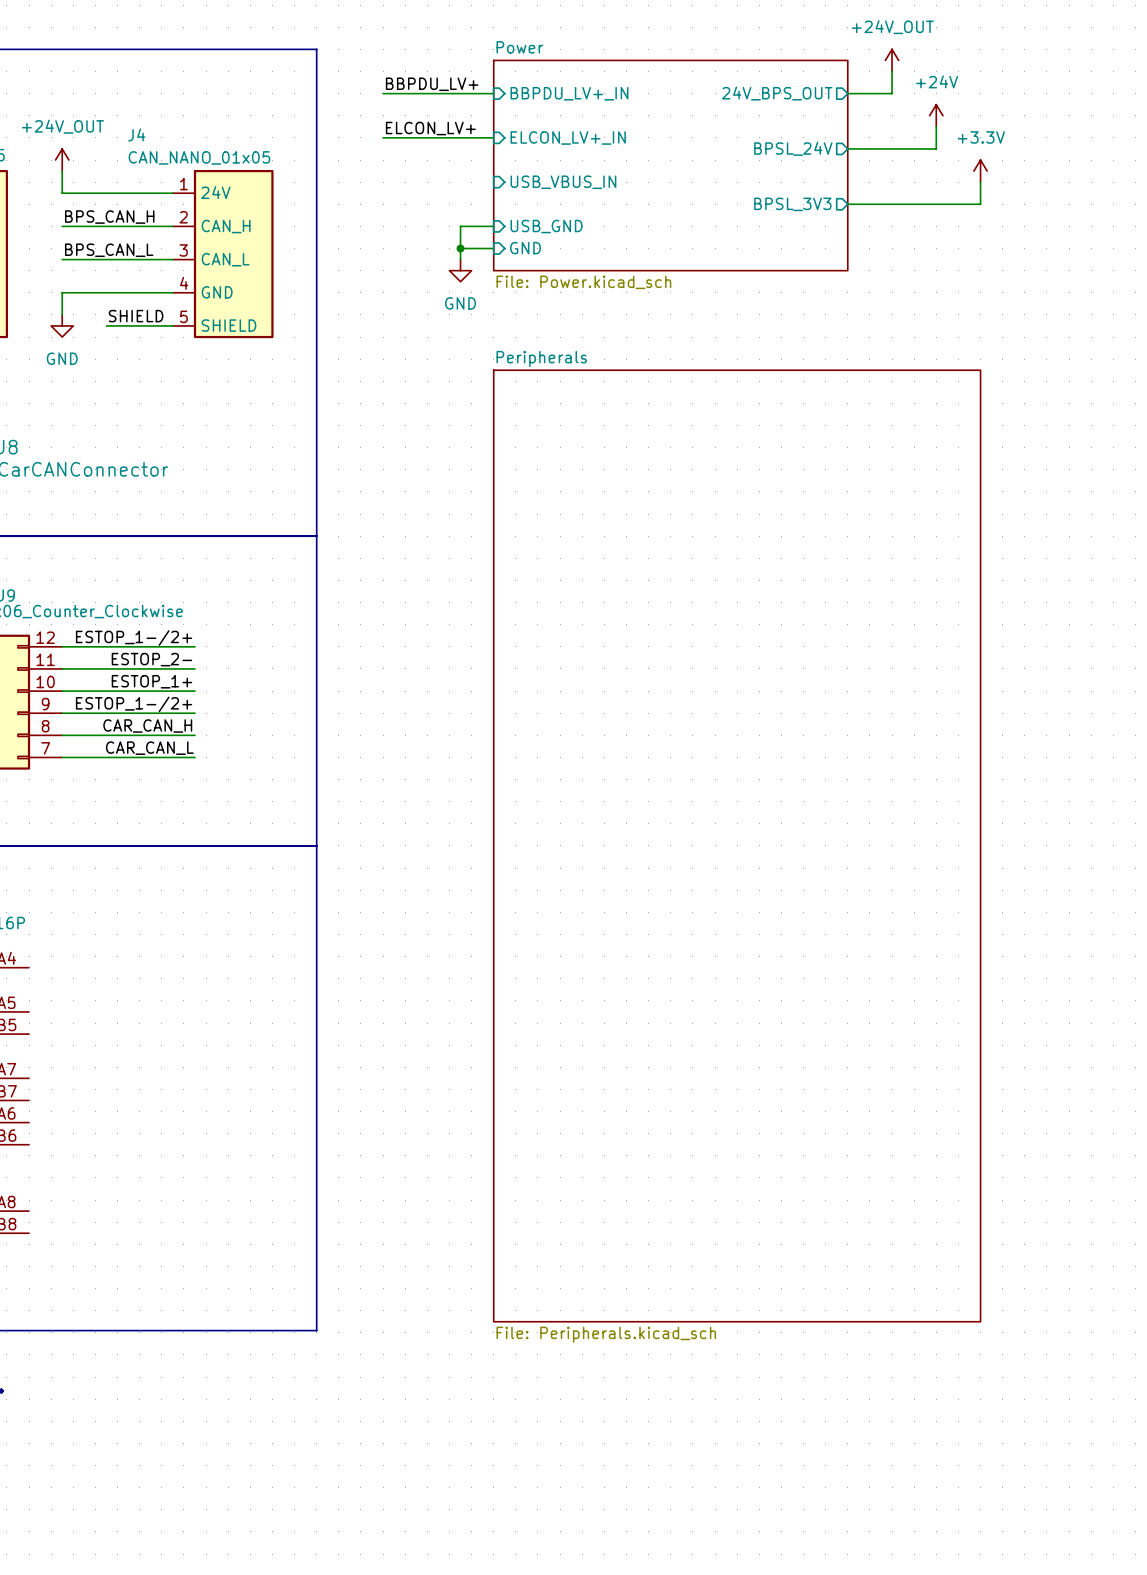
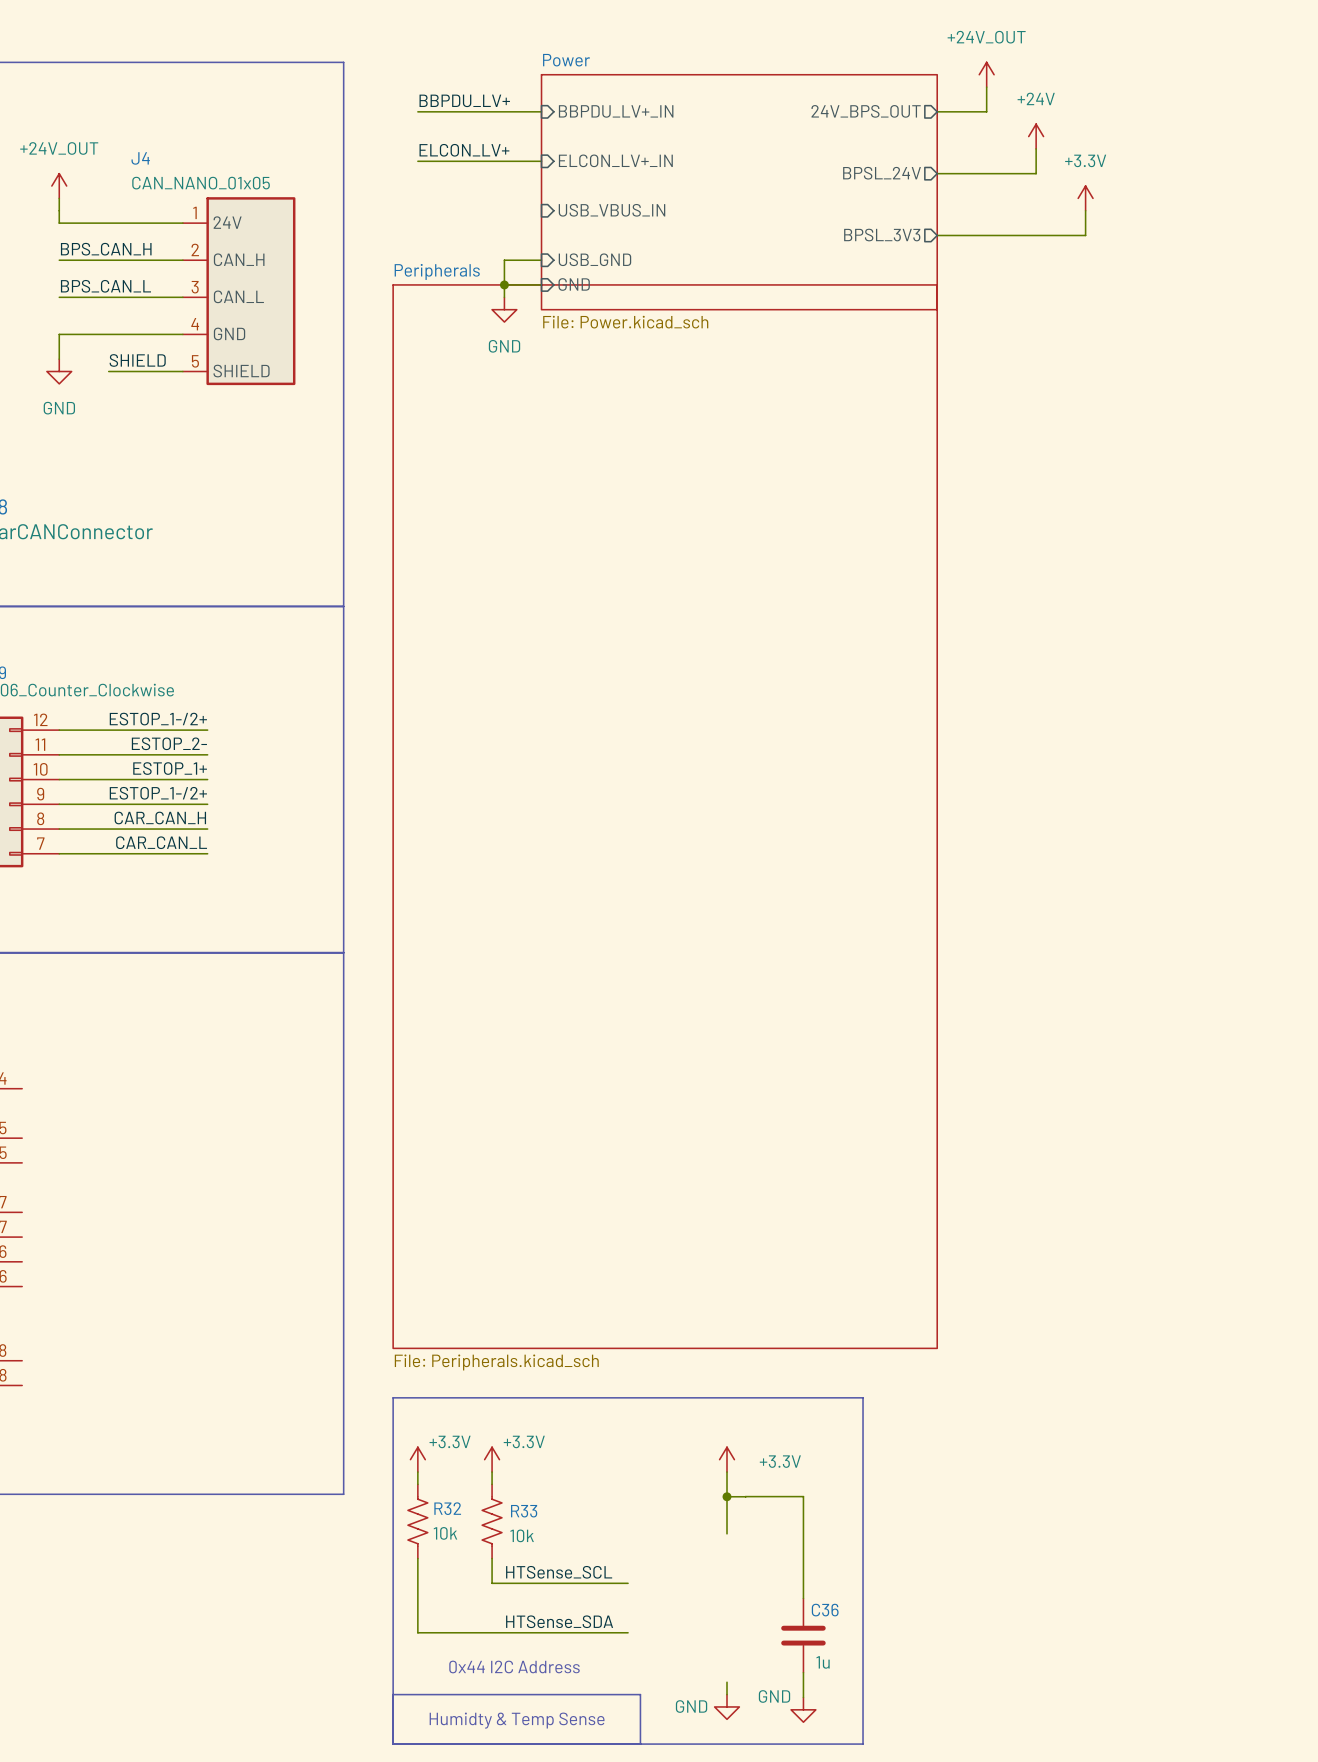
sheet Peripherals position: (737, 845) -> (665, 816)
line: none -> (393, 1397) (863, 1397) (863, 1744) (393, 1744) (393, 1397)
power symbol: none -> +3.3V (417, 1459)
power symbol: none -> +3.3V (492, 1459)
power symbol: none -> +3.3V (727, 1459)
wire: none -> (417, 1472) (417, 1484)
wire: none -> (492, 1472) (492, 1484)
wire: none -> (727, 1472) (727, 1533)
wire: none -> (727, 1496) (745, 1496)
junction: none -> (727, 1496)
wire: none -> (745, 1496) (803, 1496) (803, 1598)
R32: none -> 10k (417, 1521)
R33: none -> 10k (492, 1521)
wire: none -> (417, 1558) (417, 1632) (628, 1632)
wire: none -> (492, 1558) (492, 1583) (628, 1583)
label: none -> HTSense_SCL (559, 1572)
label: none -> HTSense_SDA (559, 1621)
C36: none -> 1u (803, 1635)
text: none -> 0x44 I2C Address (514, 1666)
wire: none -> (803, 1672) (803, 1697)
wire: none -> (727, 1682) (727, 1694)
line: none -> (393, 1694) (640, 1694) (640, 1744)
power symbol: none -> GND (727, 1706)
power symbol: none -> GND (803, 1709)
text: none -> Humidty & Temp Sense (517, 1720)

